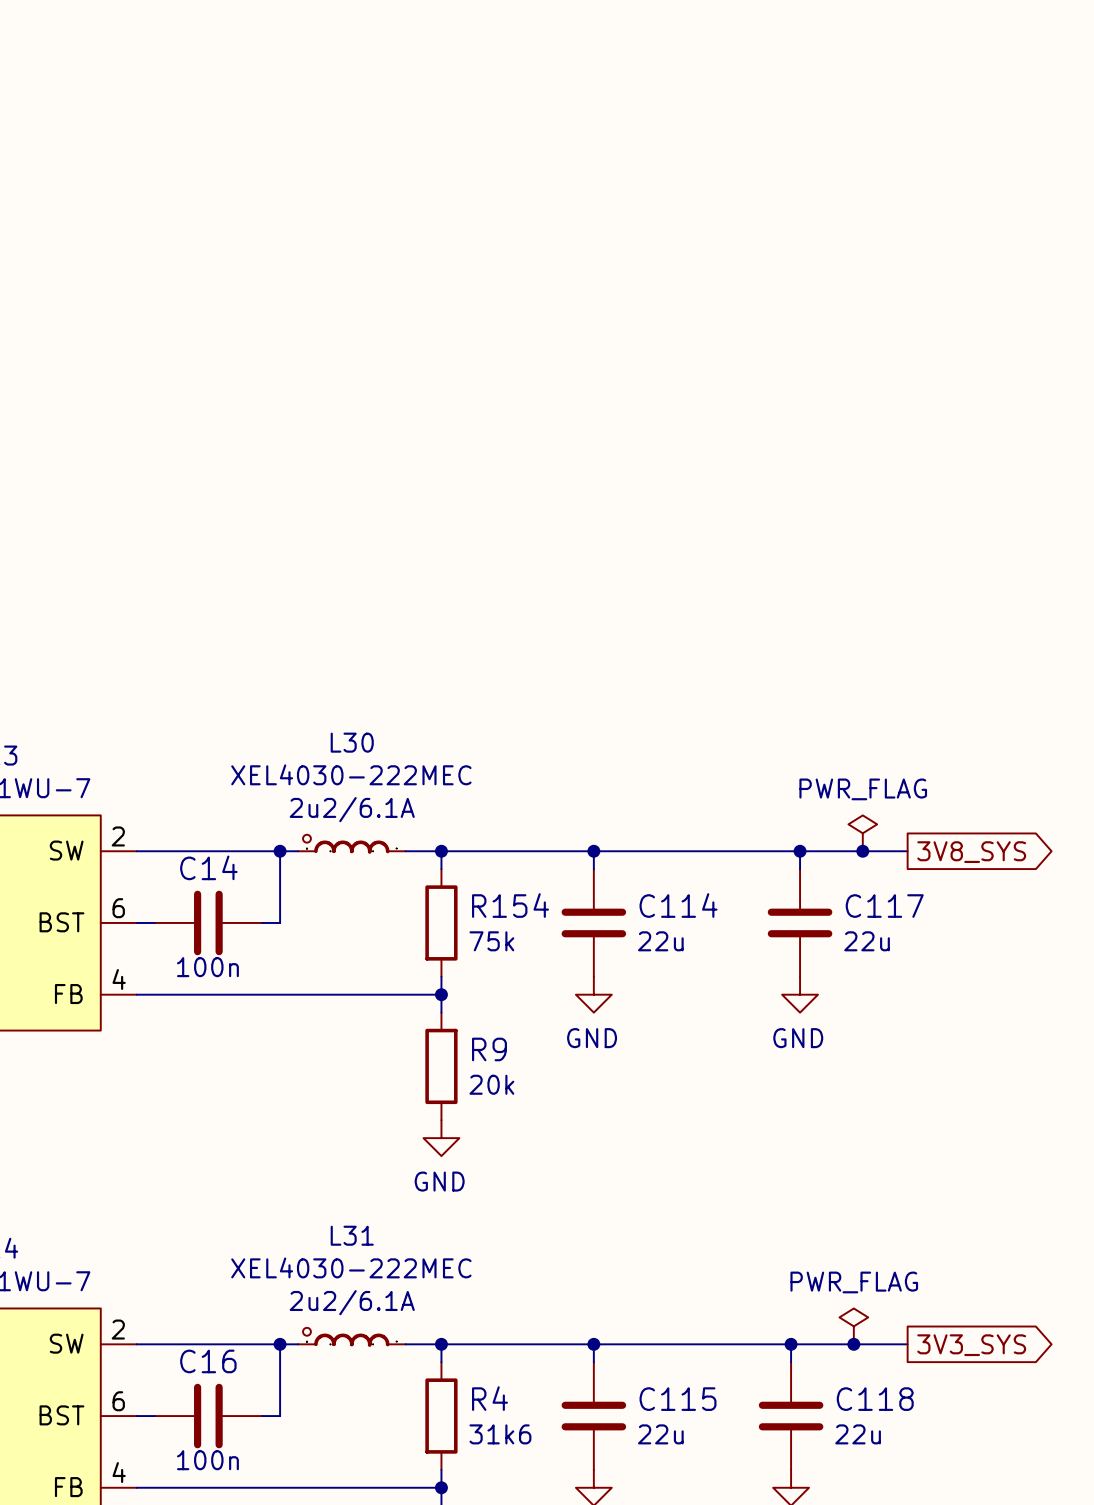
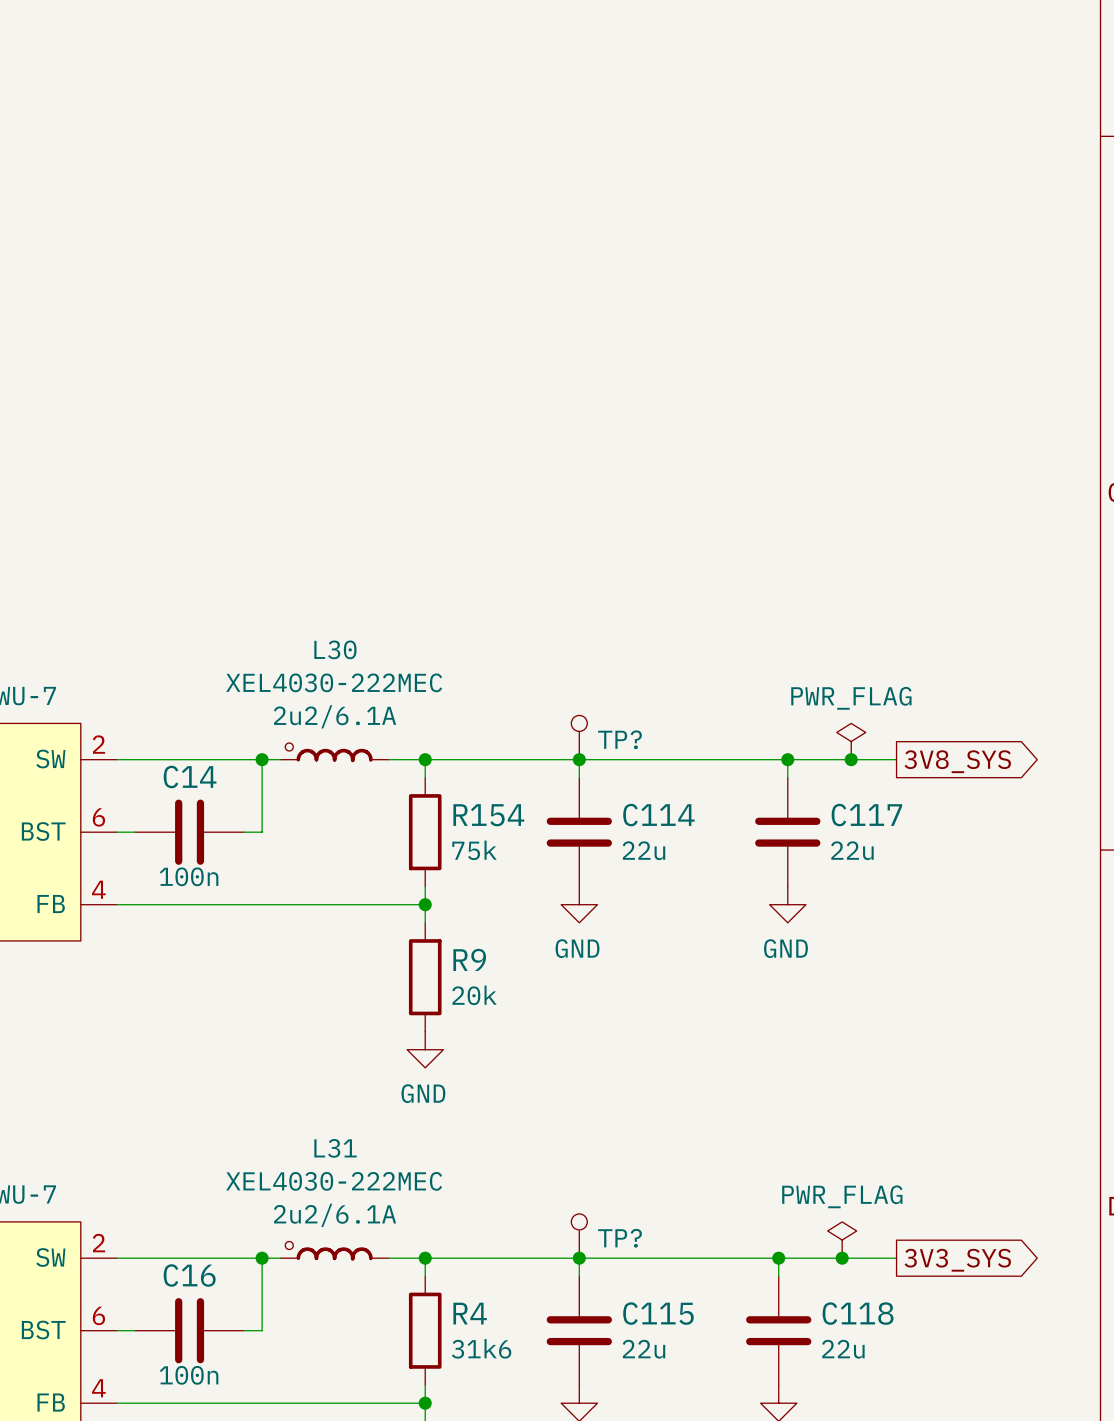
TP?: none -> (579, 737)
TP?: none -> (579, 1236)

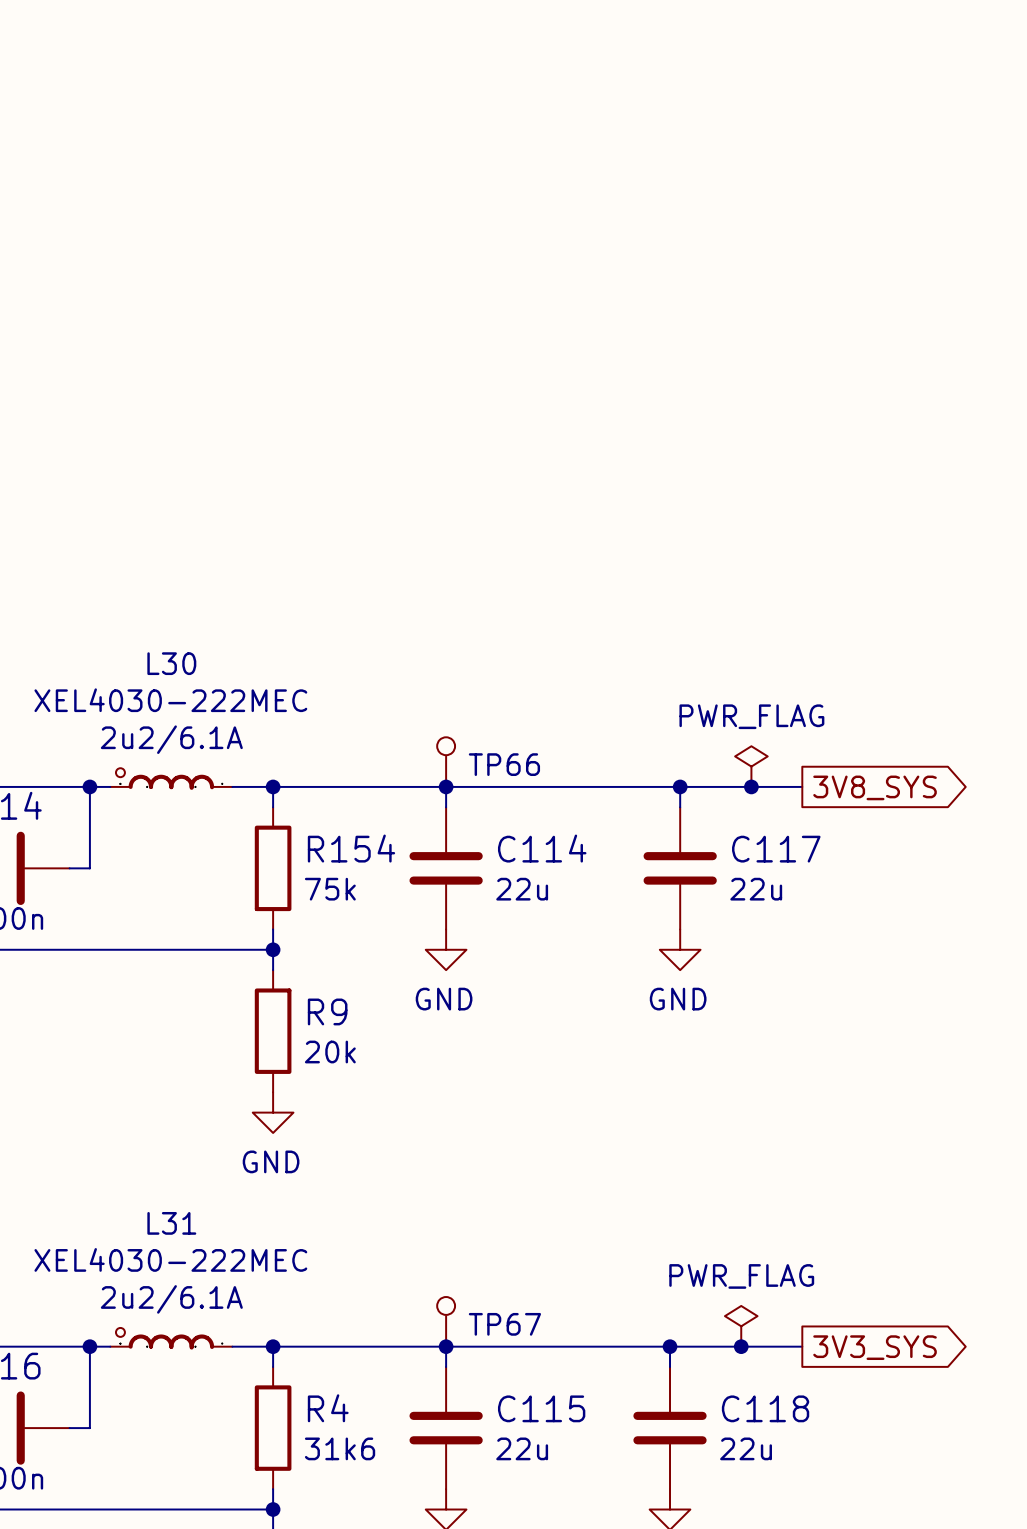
TP? name: TP? (619, 739) -> TP66 (504, 764)
TP? name: TP? (619, 1238) -> TP67 (504, 1324)

